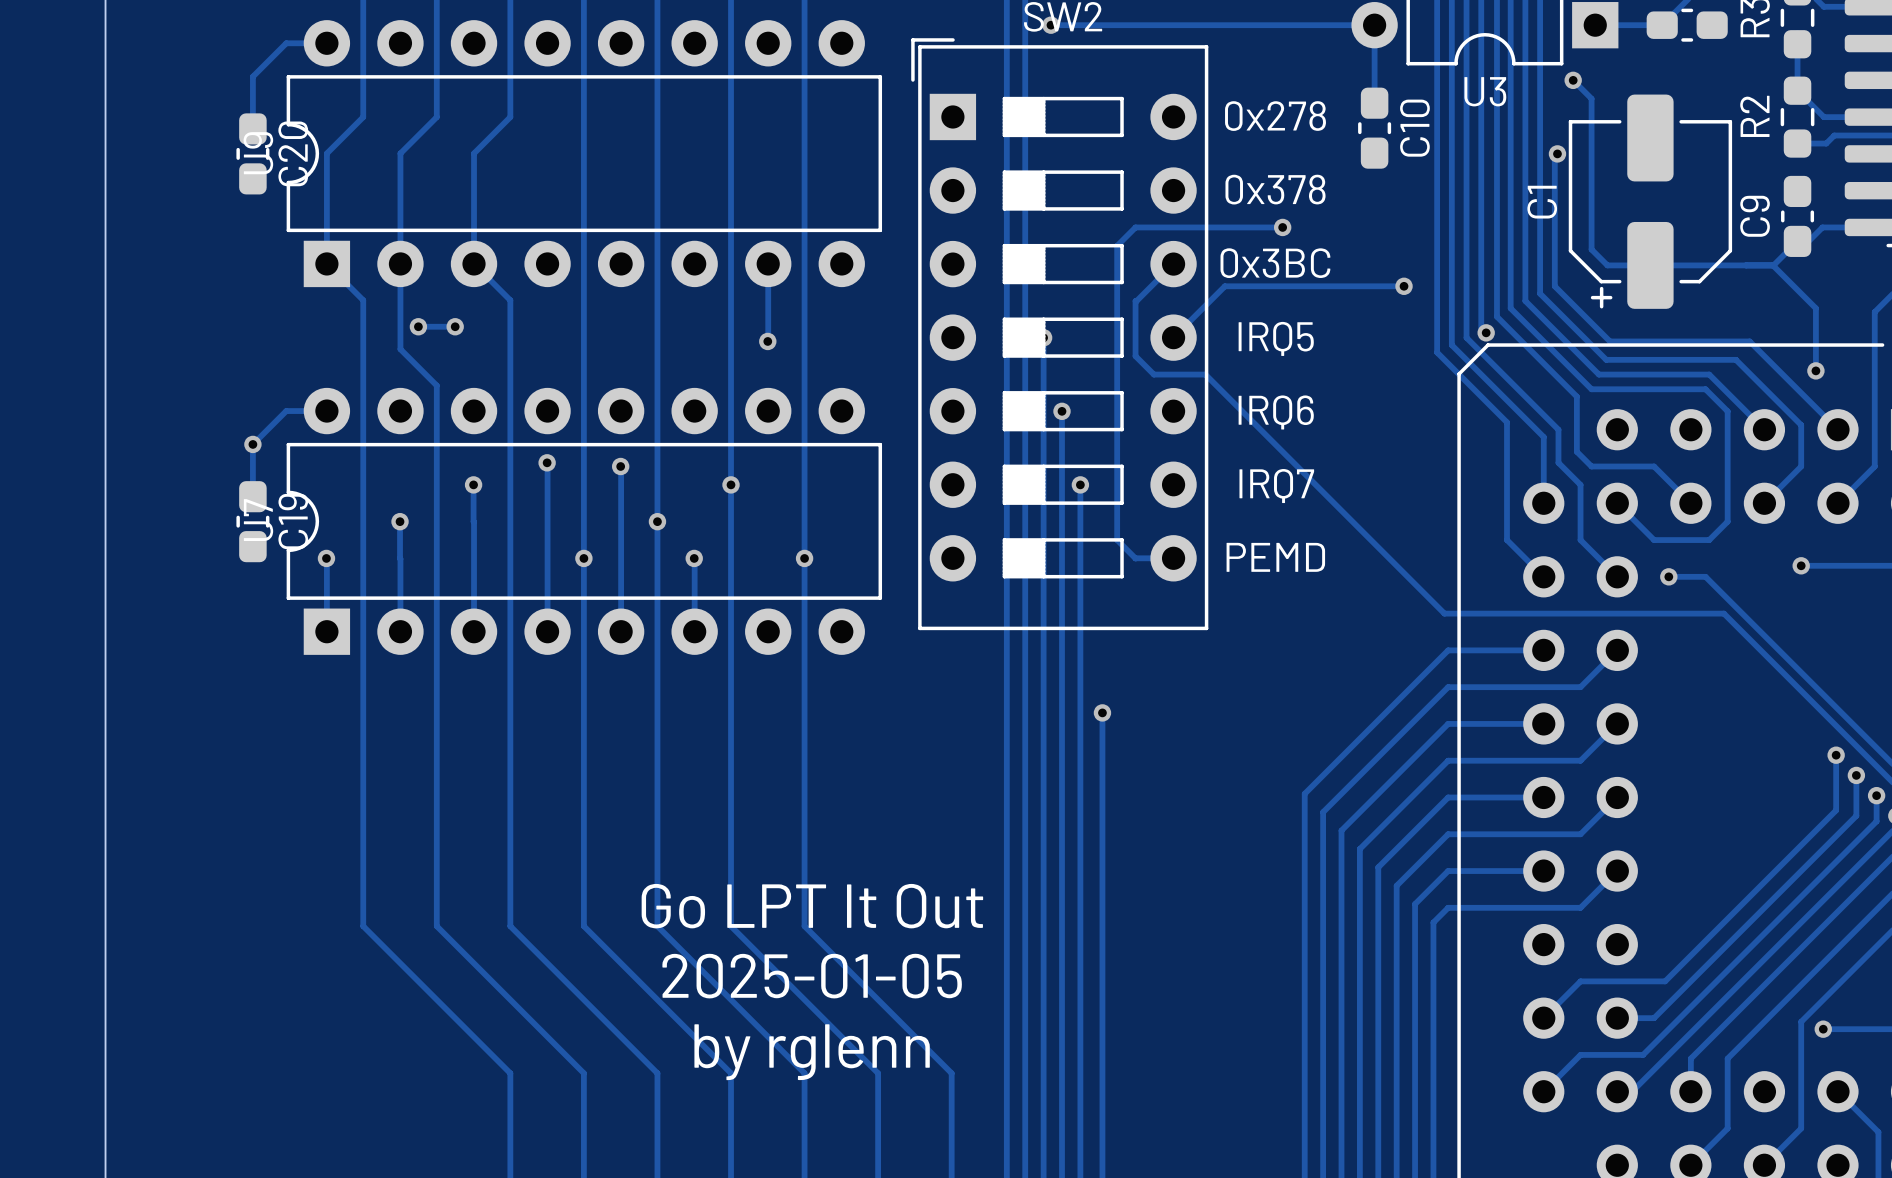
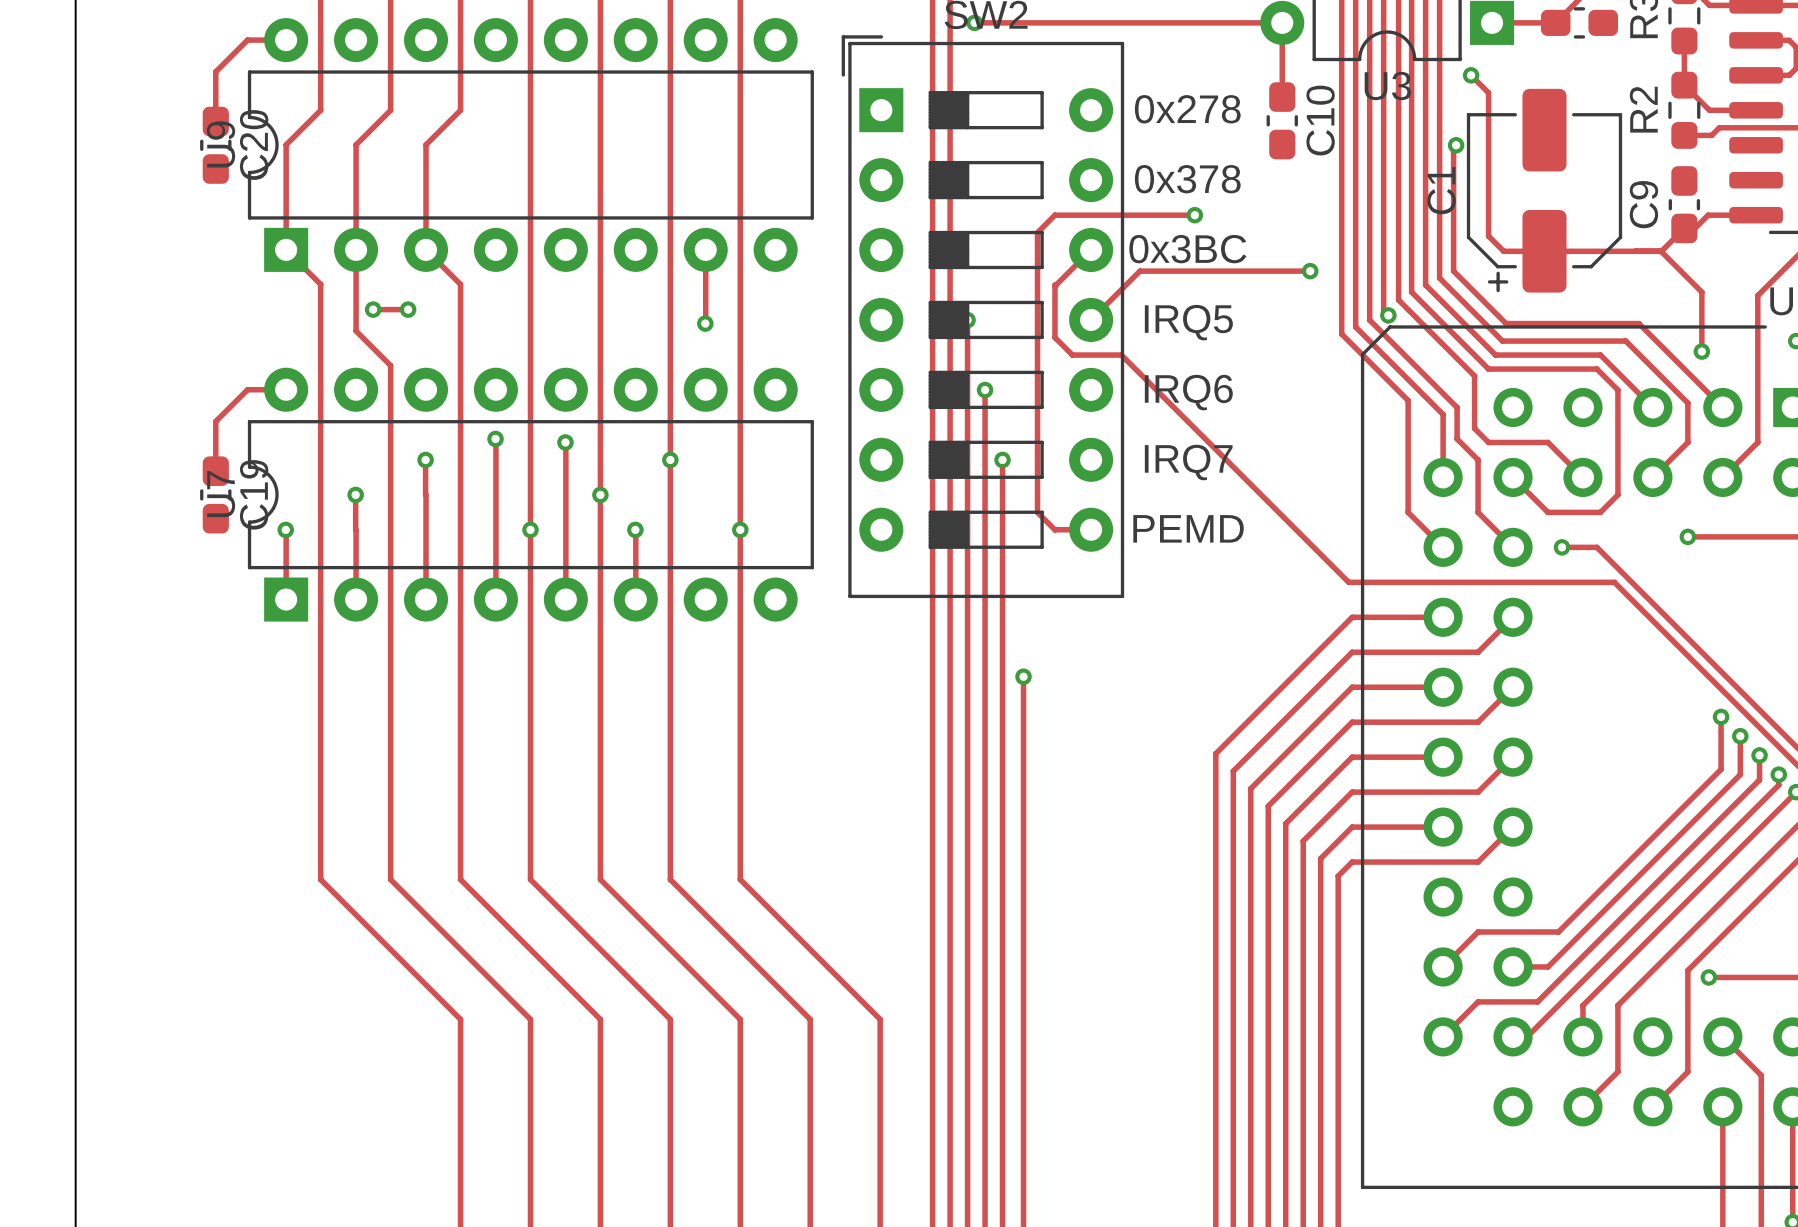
via: (252, 444) -> none
text: Go LPT It Out (812, 906) -> none
text: 2025-01-05 (812, 976) -> none
text: by rglenn (812, 1052) -> none

